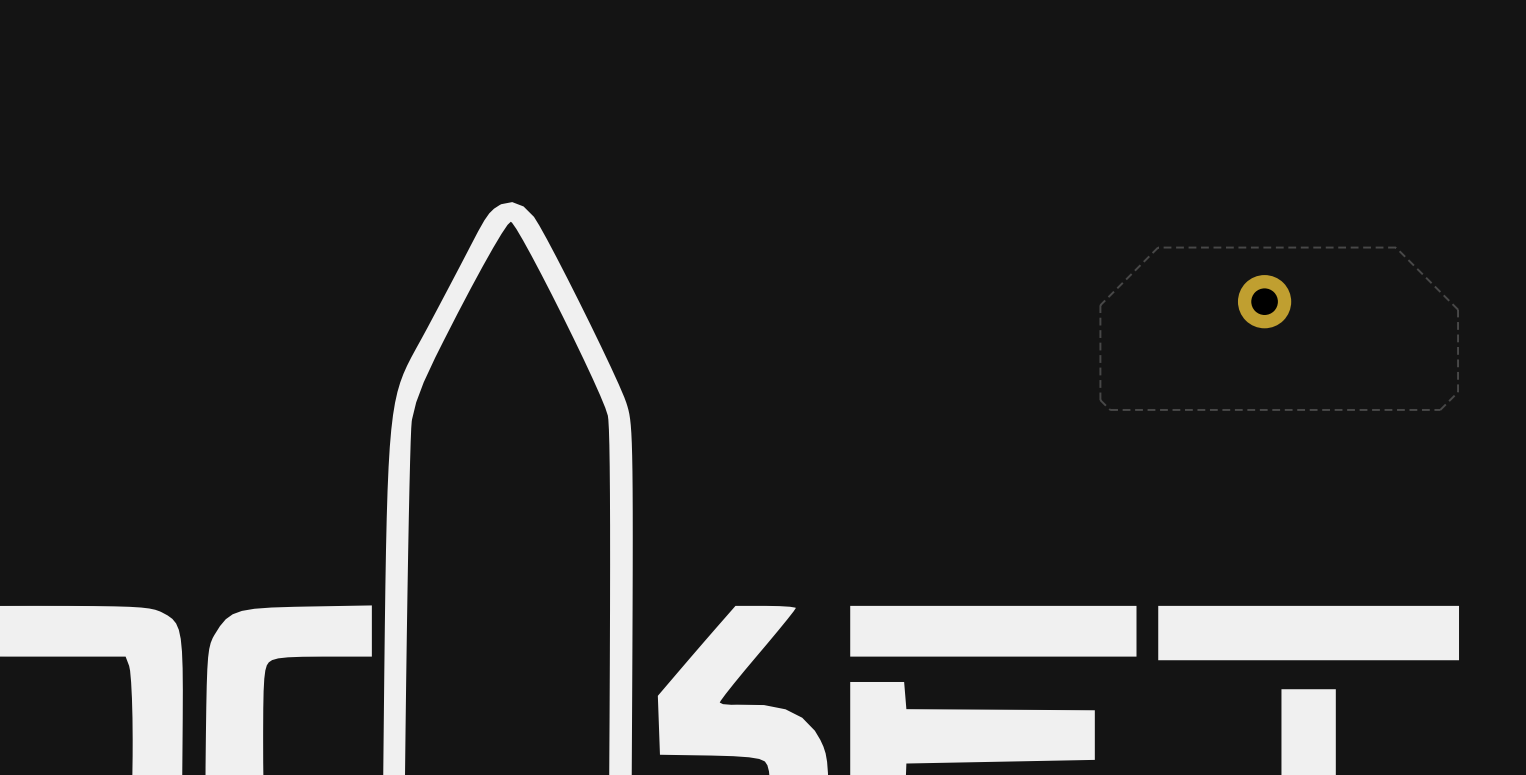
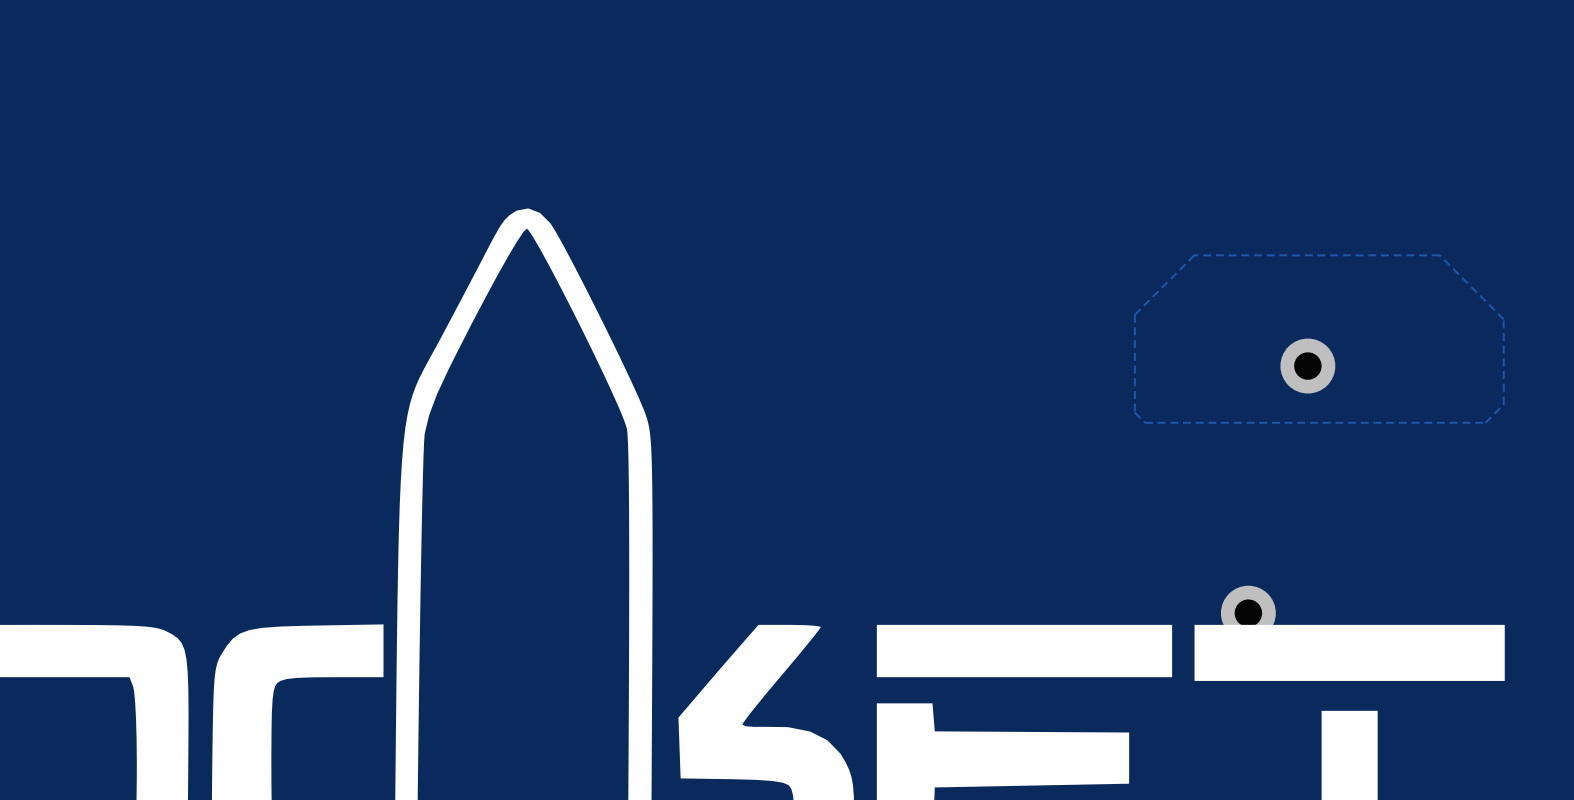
via position: (1264, 301) -> (1307, 366)
via: none -> (1248, 613)

